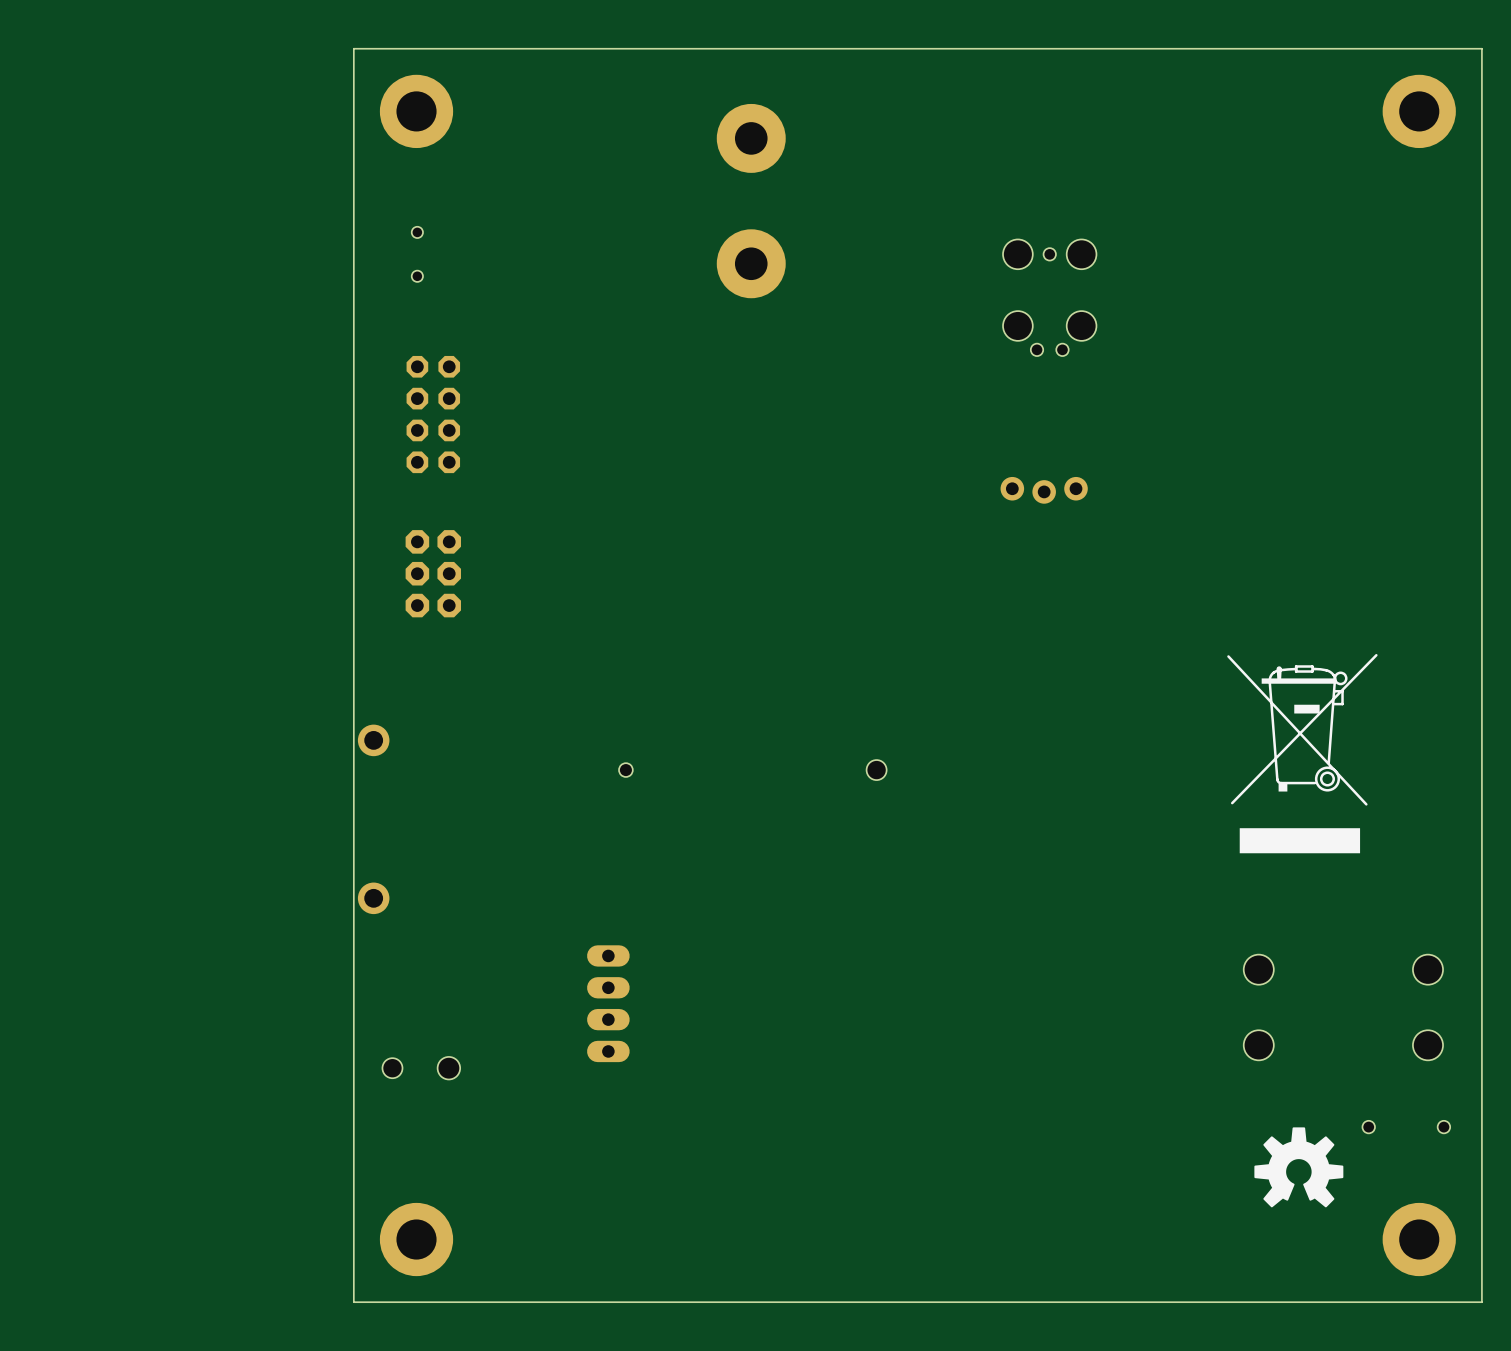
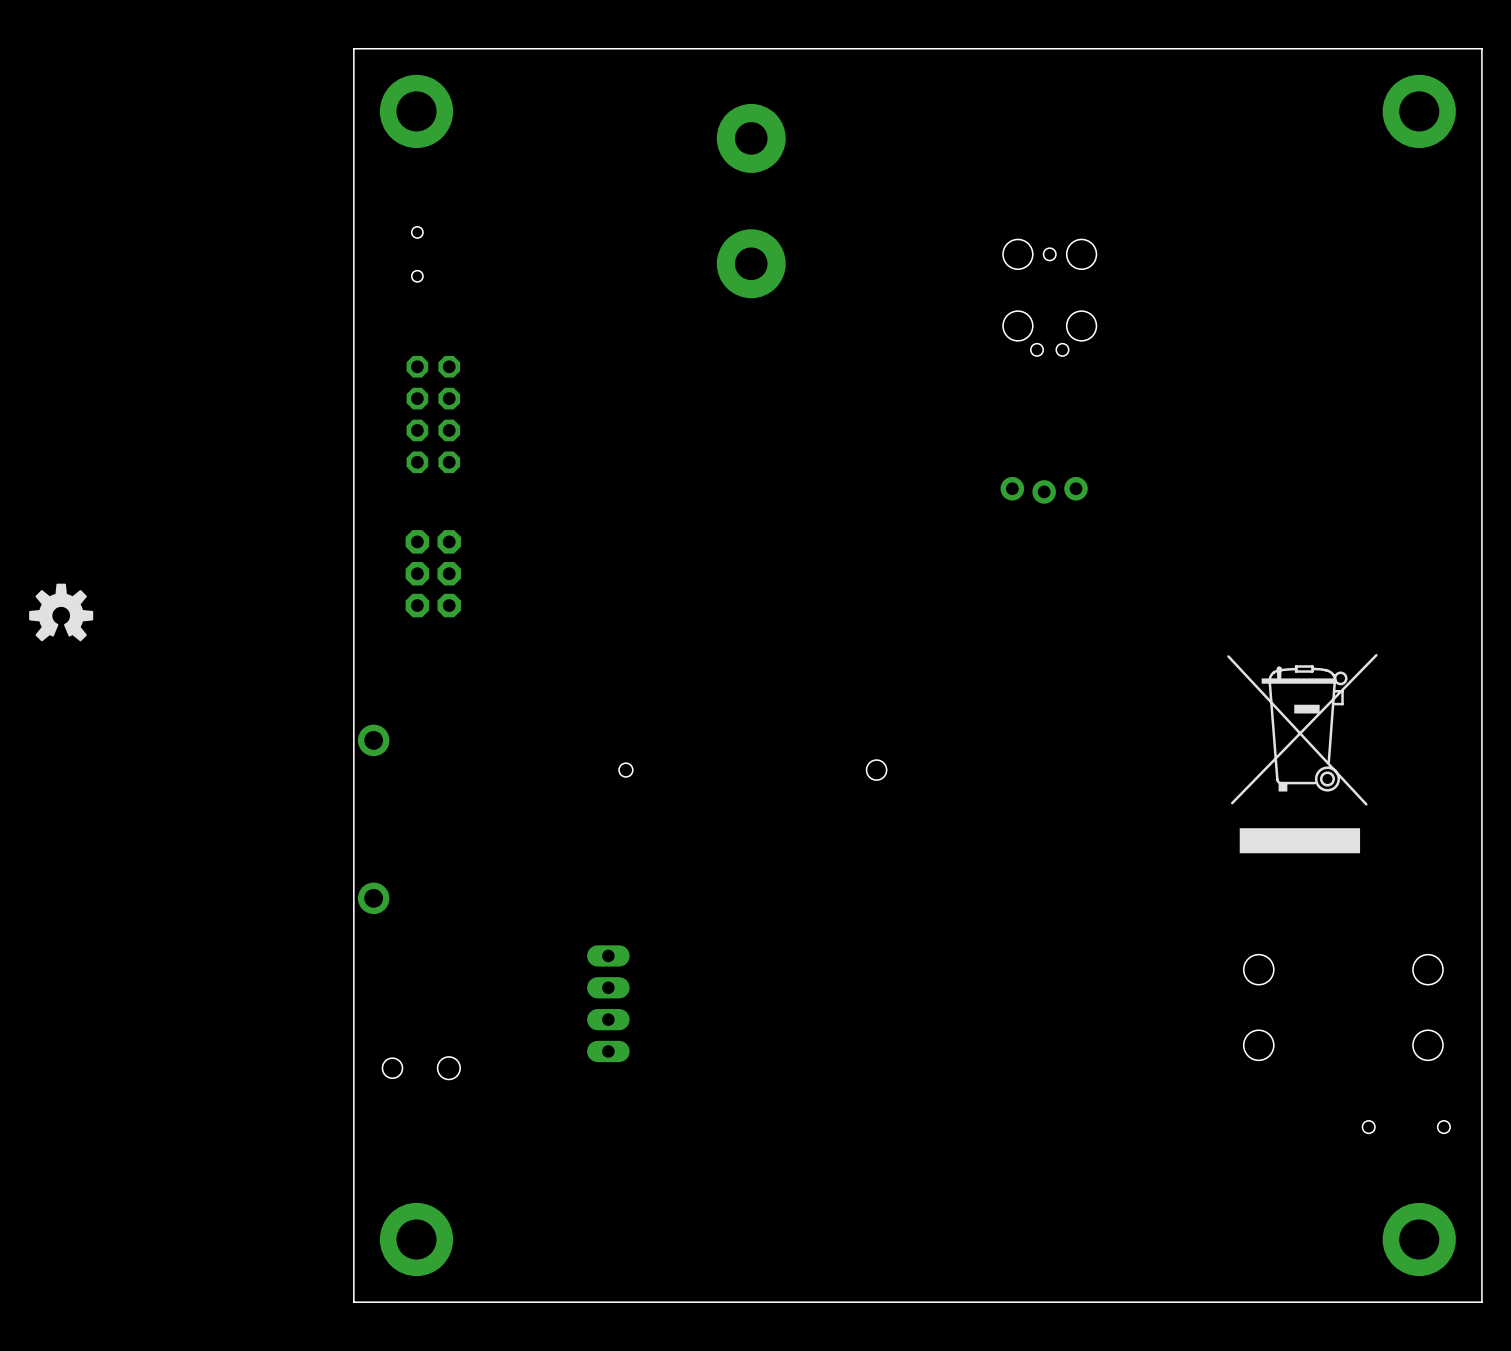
drawing: none -> [29, 583, 94, 642]
drawing: [1254, 1127, 1344, 1208] -> none

